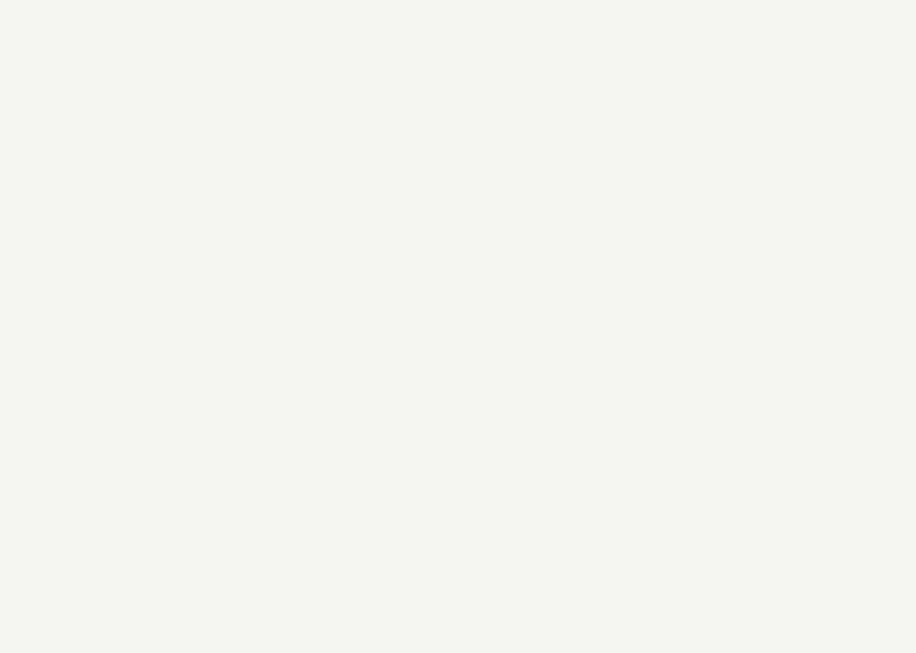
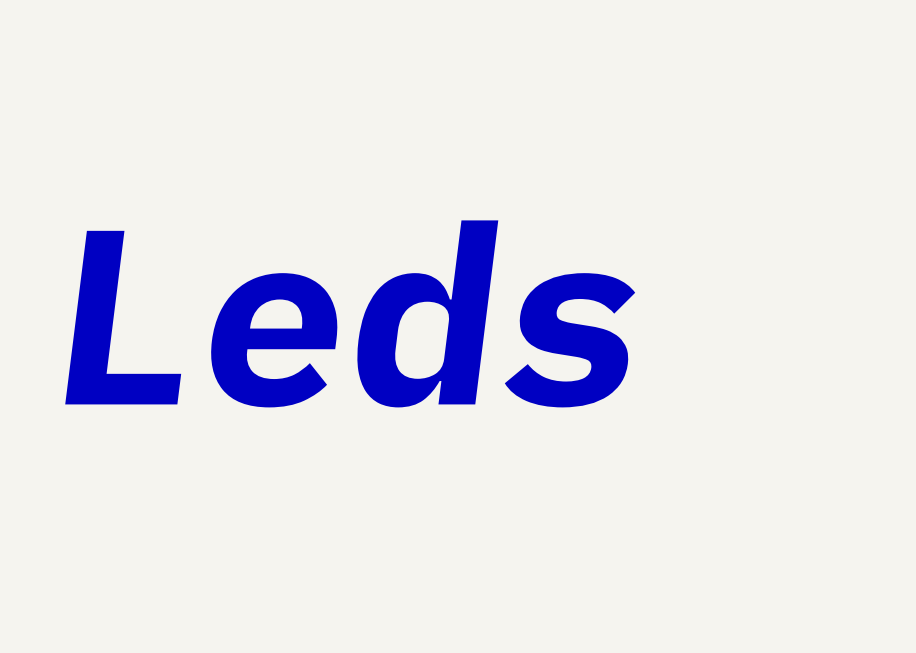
text: none -> Leds (350, 313)

